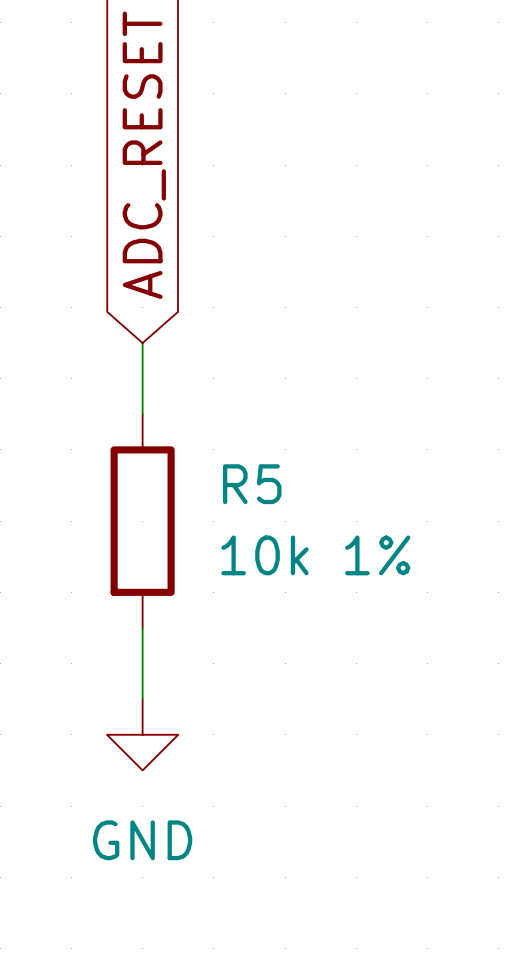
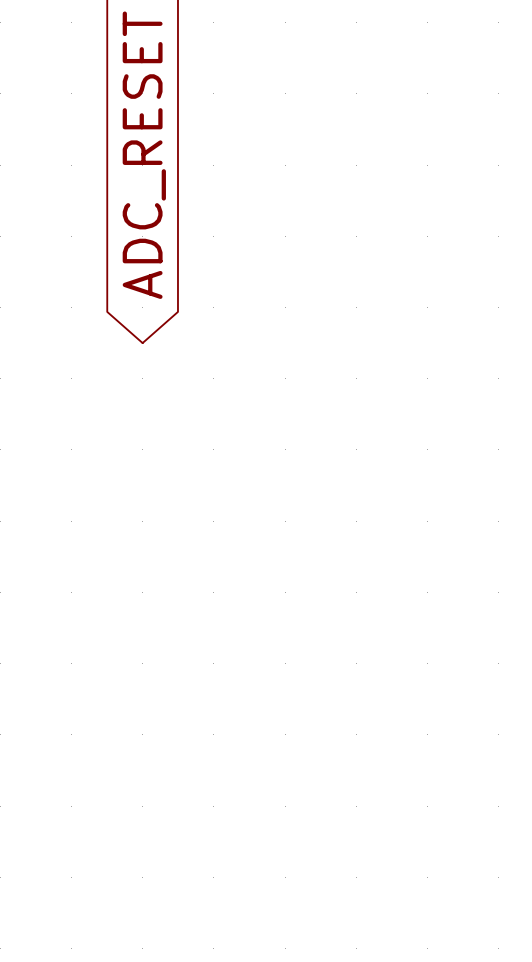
wire: (142, 343) (142, 414) -> none
R5: 10k 1% (142, 521) -> none
wire: (142, 627) (142, 699) -> none
power symbol: GND (142, 734) -> none

